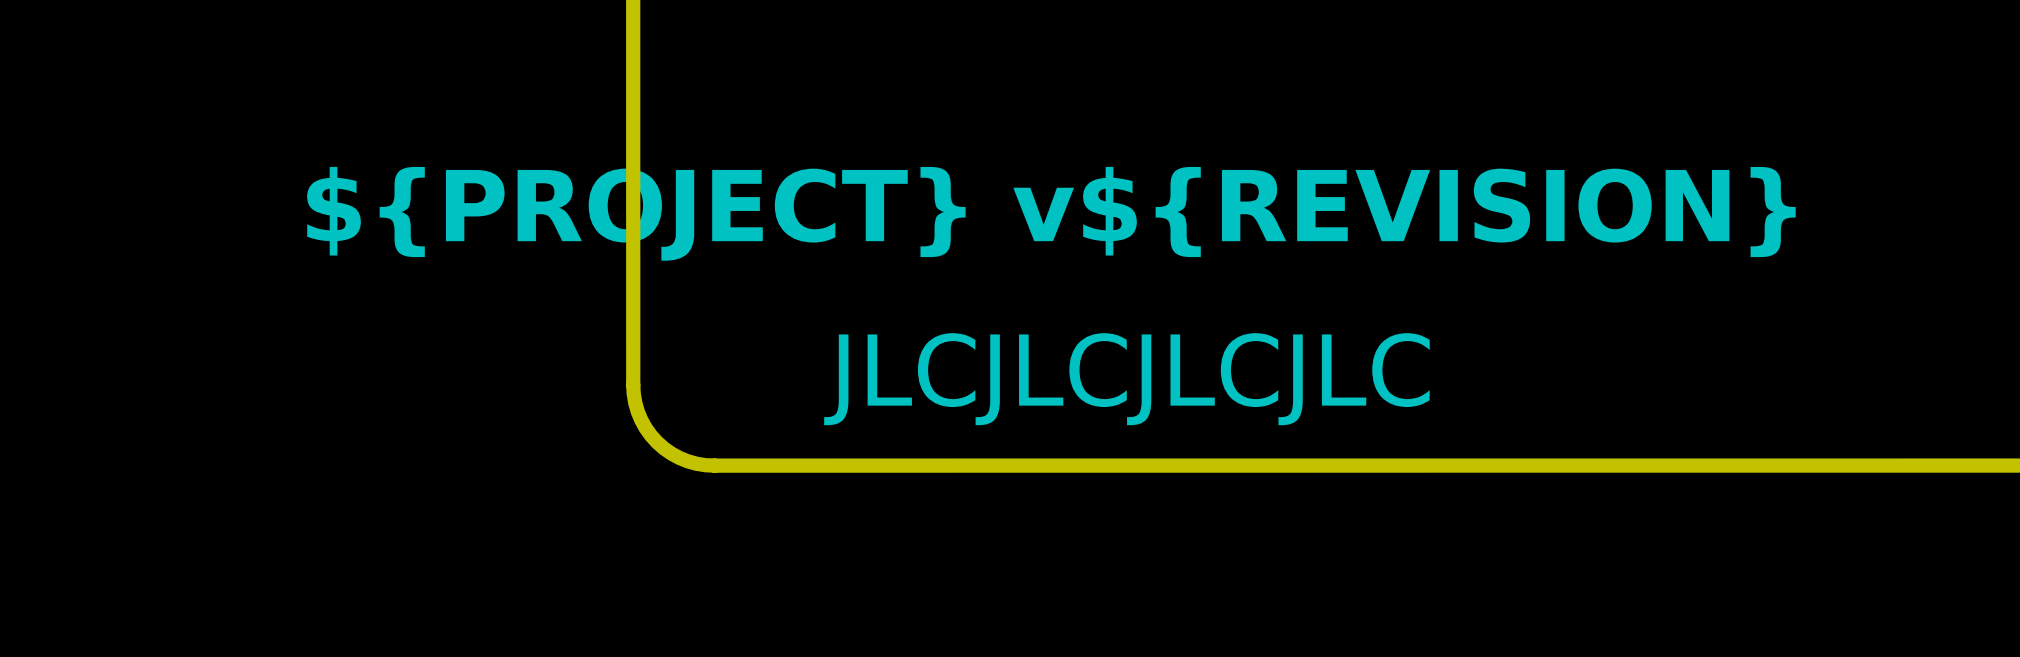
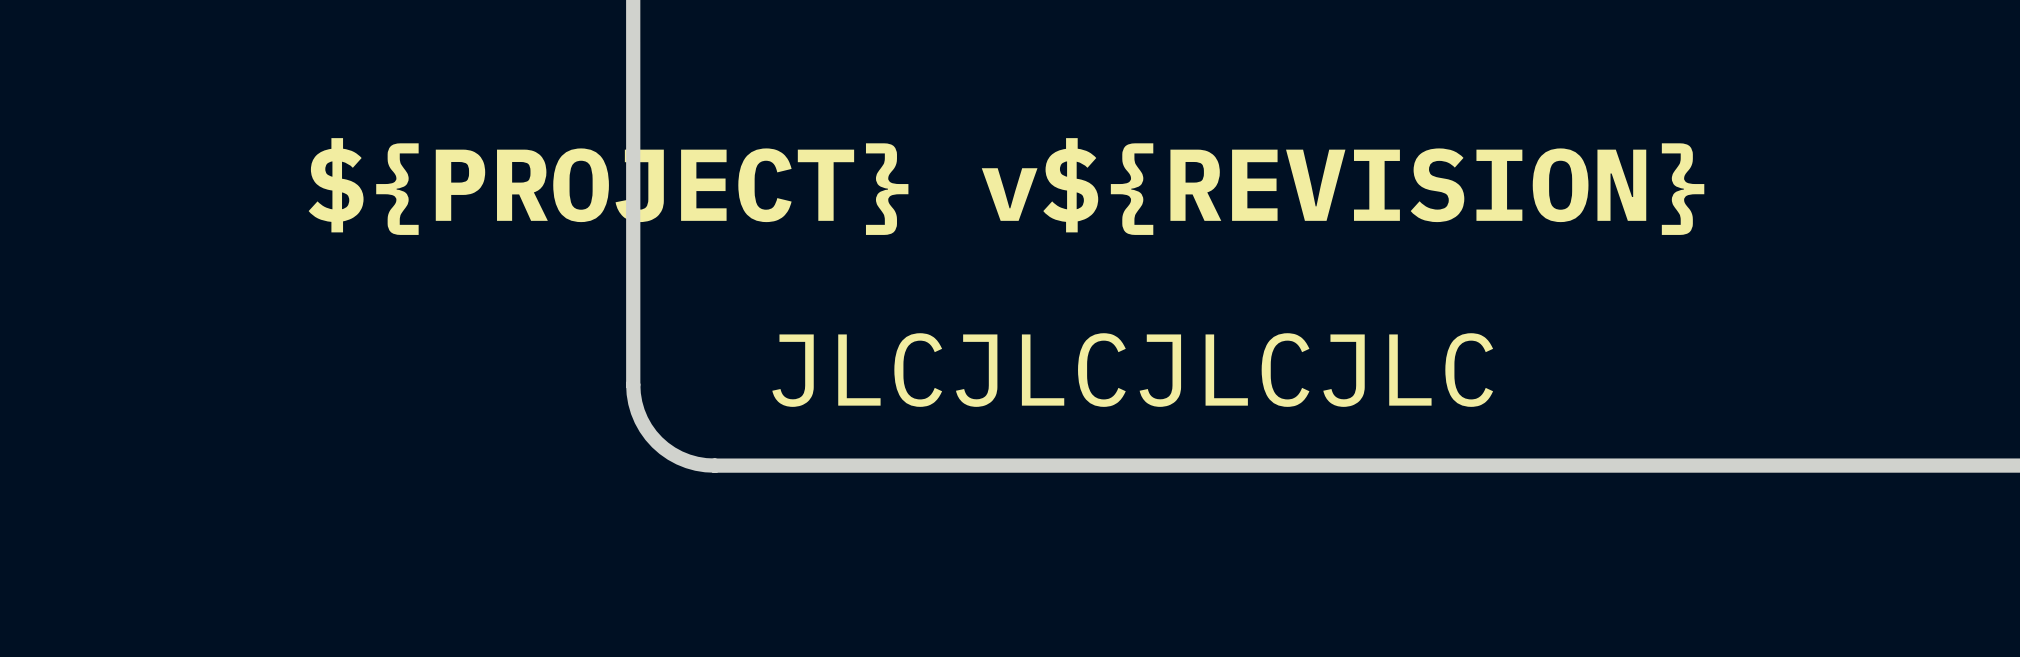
drawing position: (1051, 213) -> (1006, 186)

